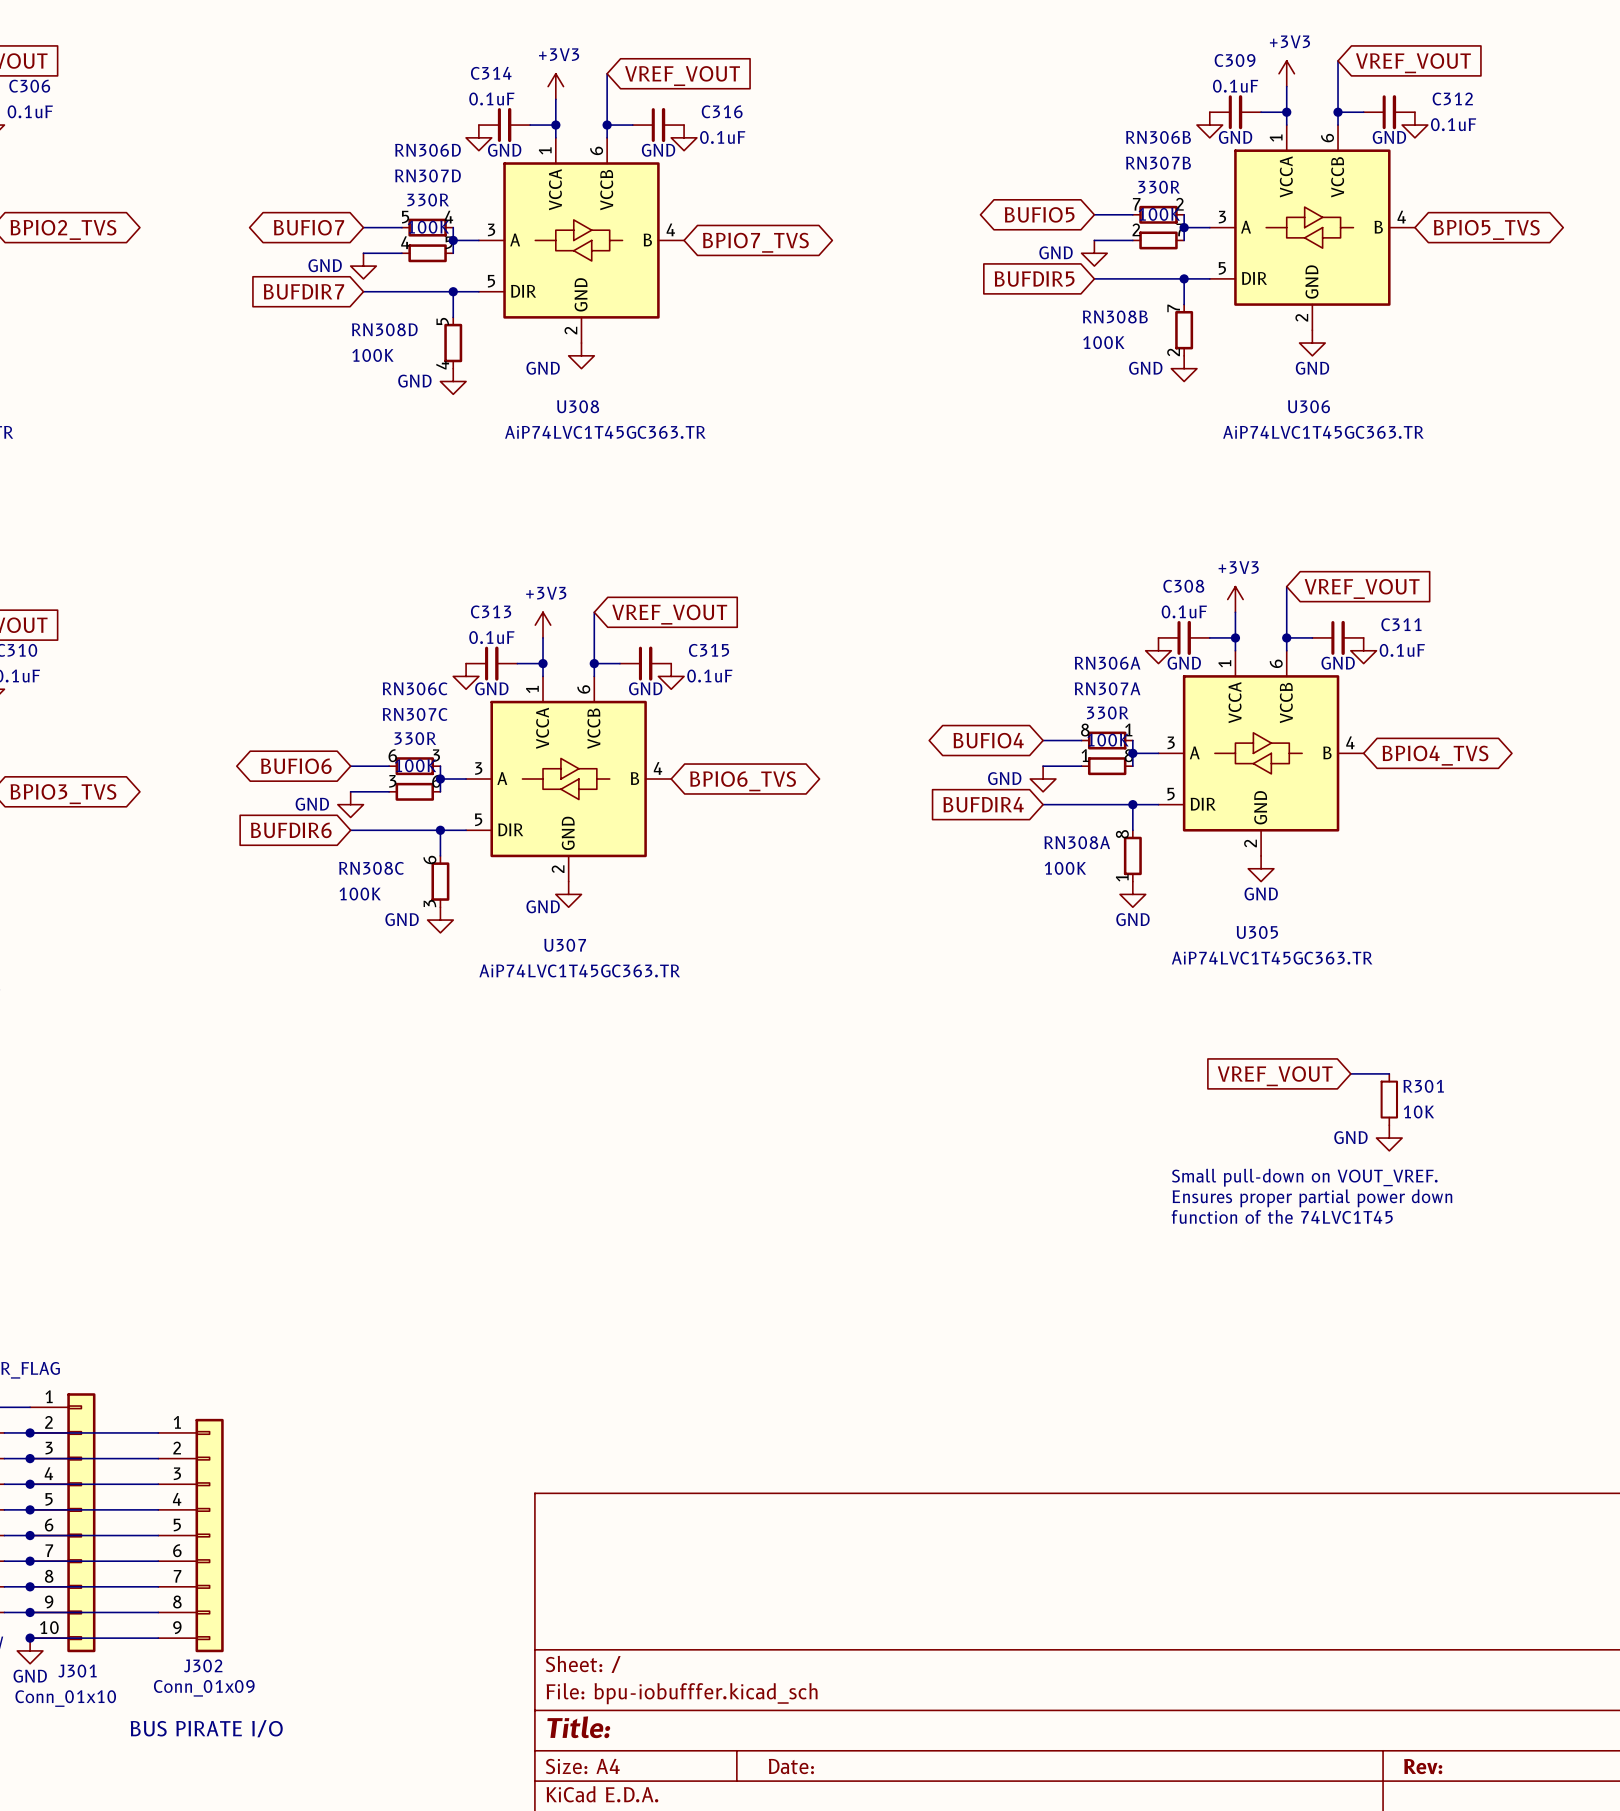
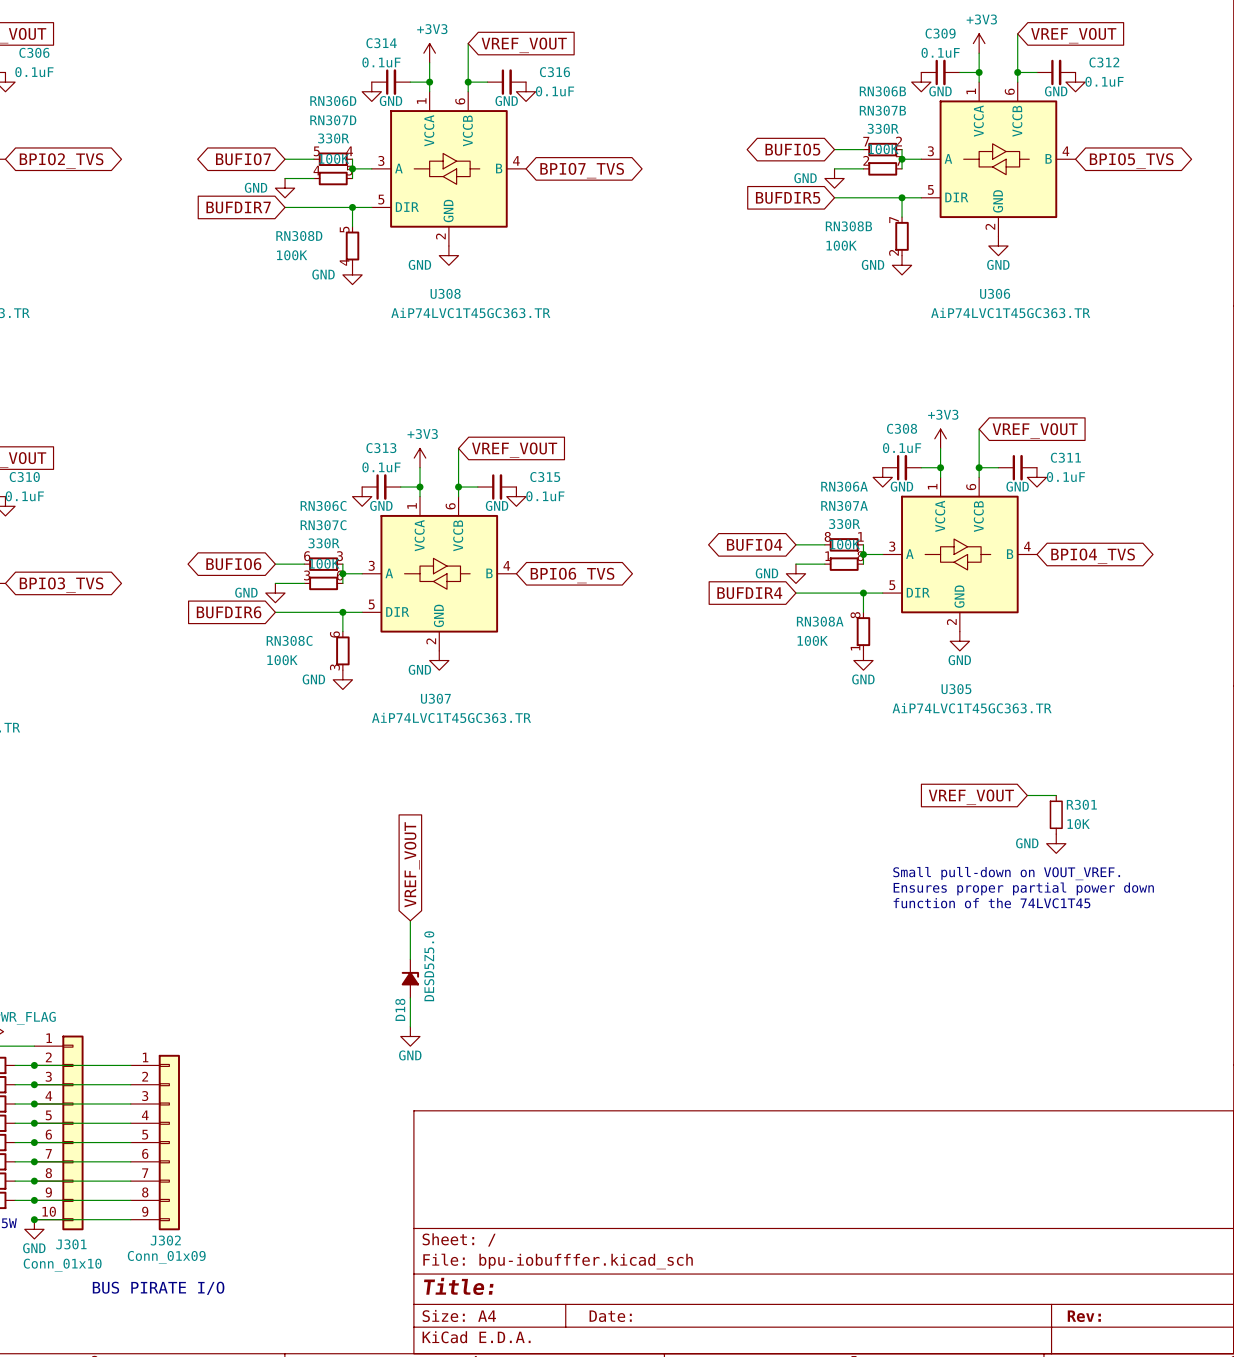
global label: none -> VREF_VOUT (412, 864)
wire: none -> (410, 920) (410, 959)
D18: none -> DESD5Z5.0 (410, 978)
wire: none -> (410, 997) (410, 1026)
power symbol: none -> GND (410, 1036)

